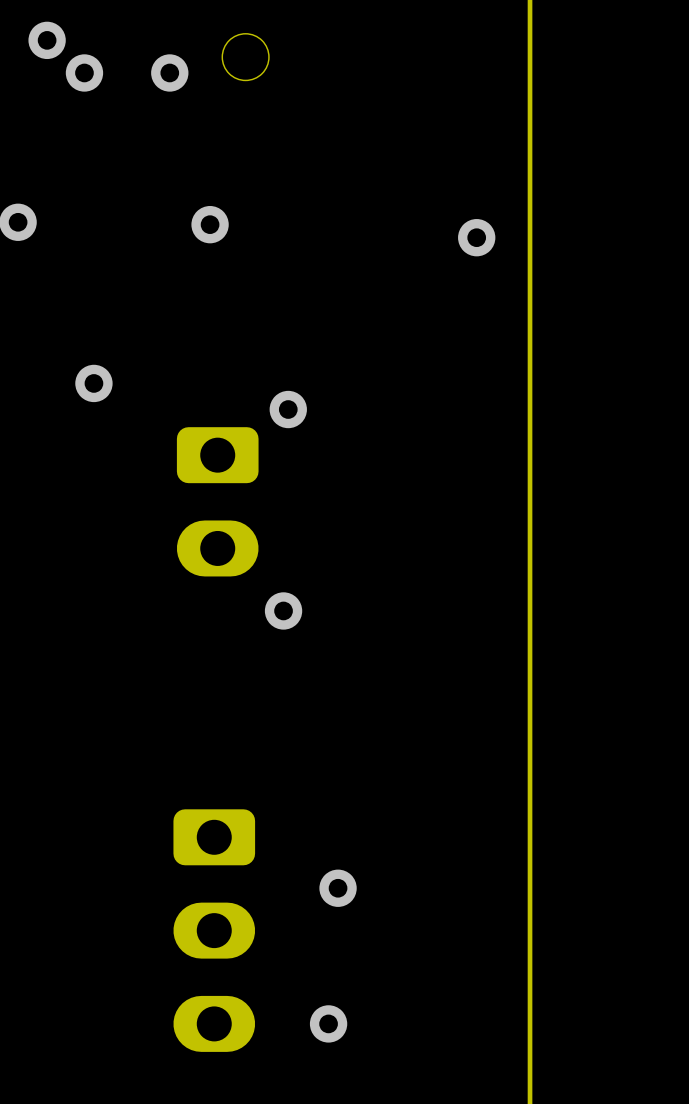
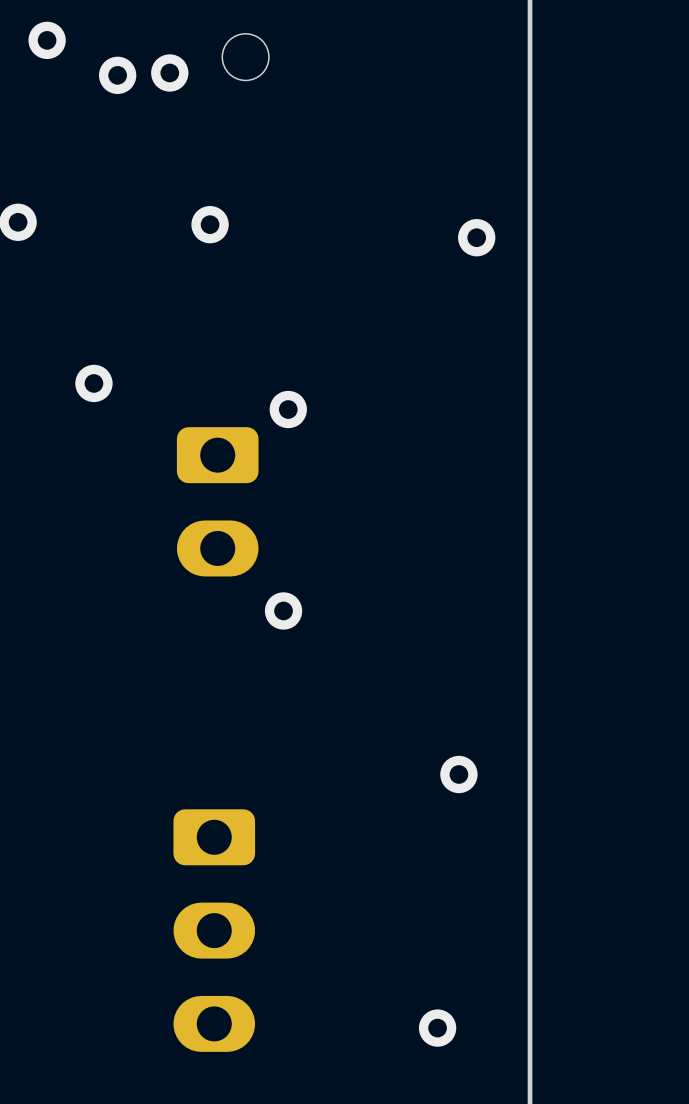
via position: (84, 72) -> (117, 75)
via: none -> (458, 774)
via: (338, 888) -> none
via: (328, 1023) -> none
via: none -> (437, 1028)

